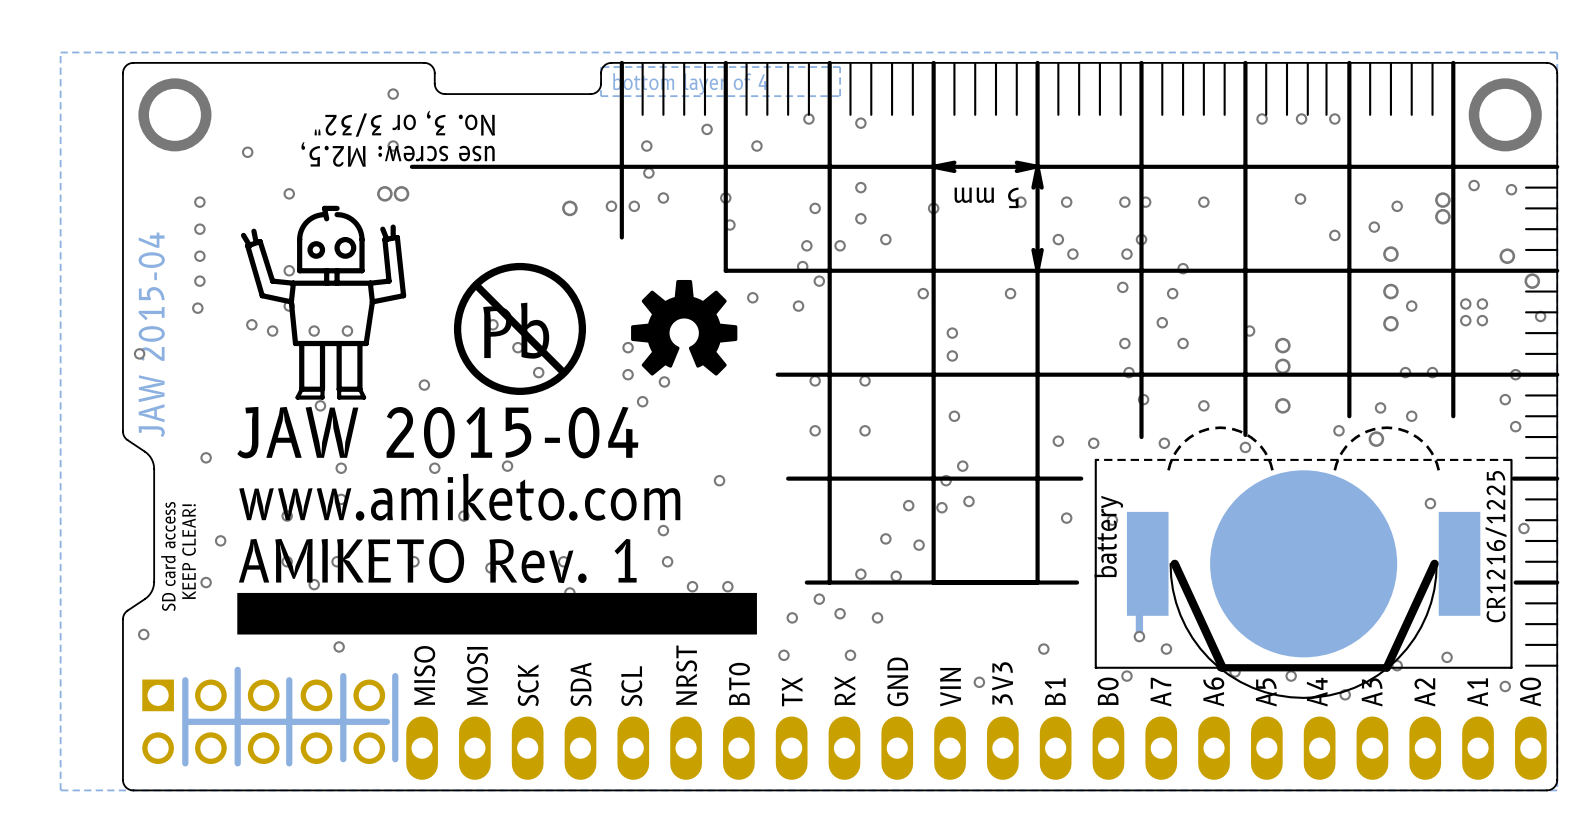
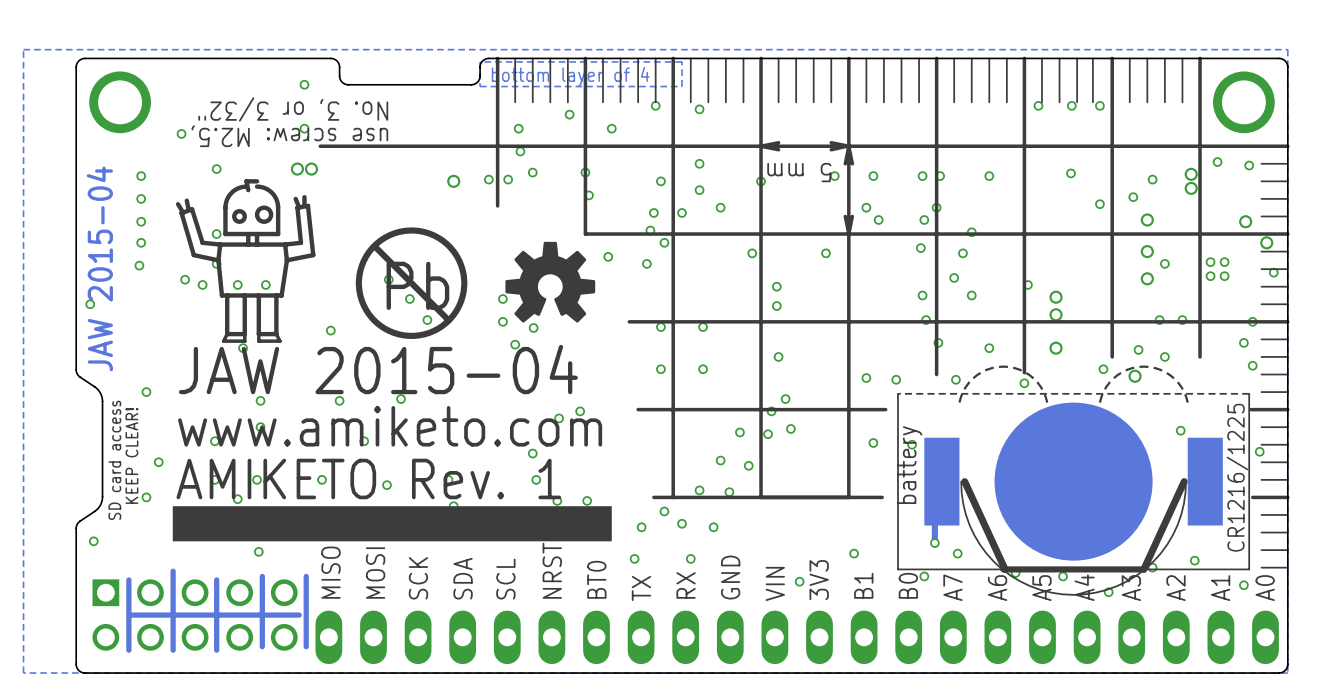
via: none -> (559, 418)

